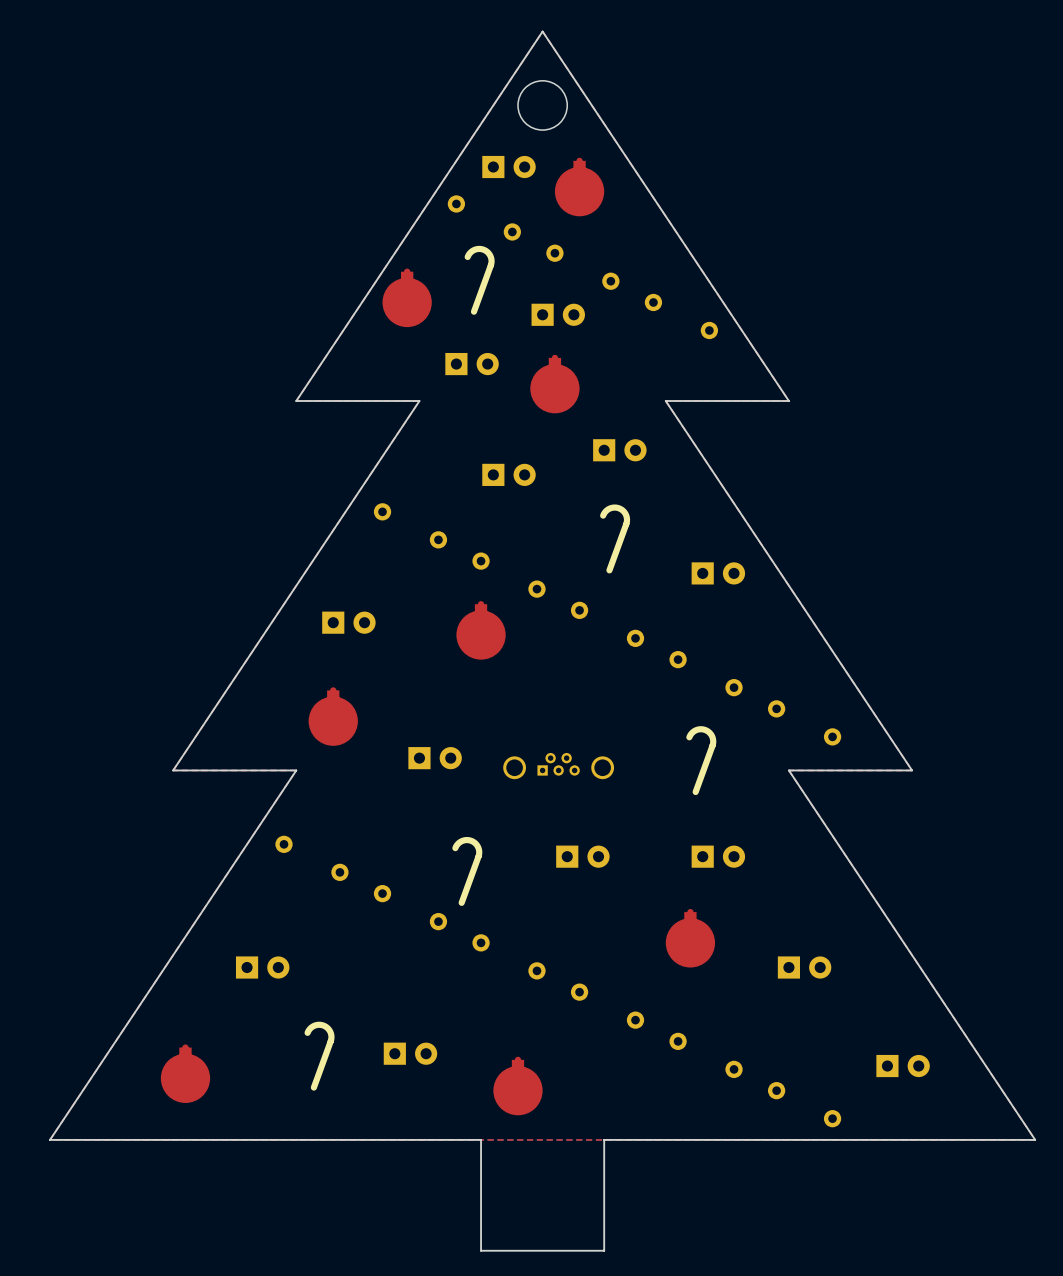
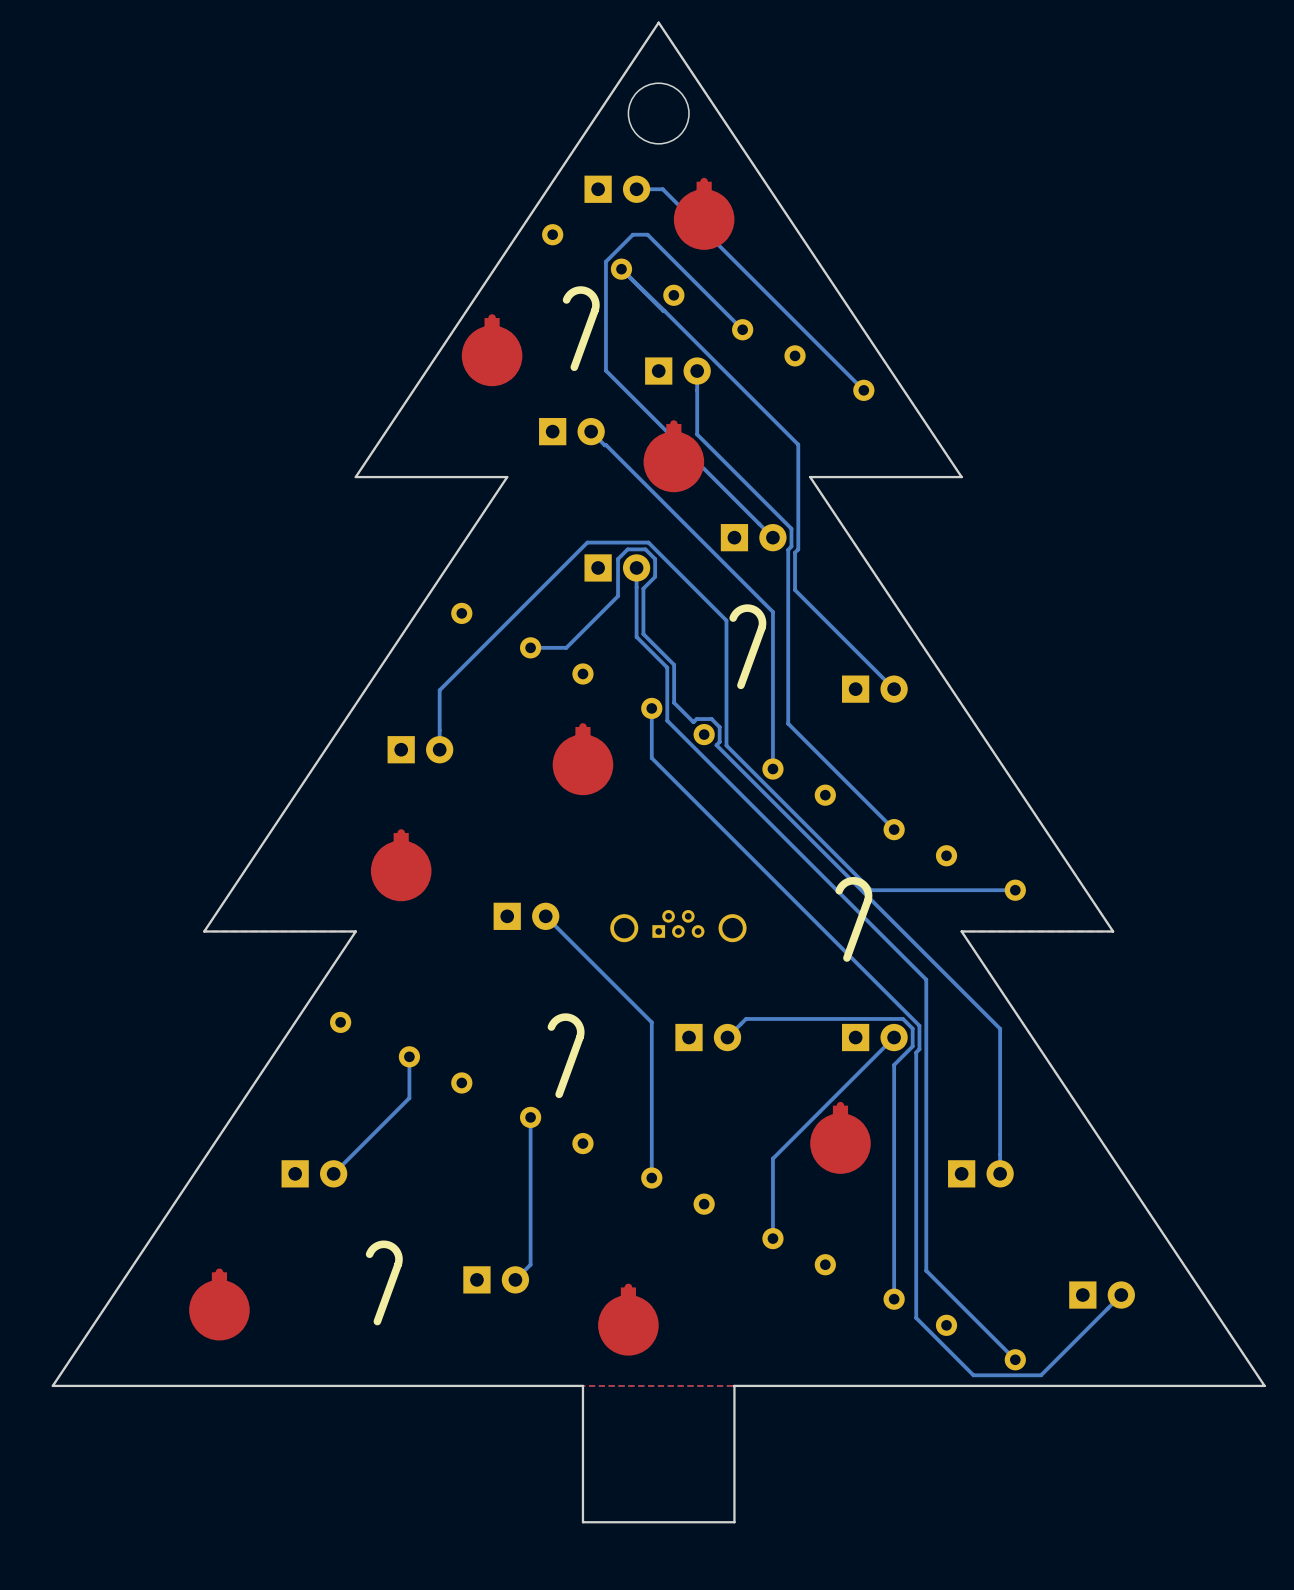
bottom track: none -> (636, 189) (662, 189) (863, 390)
bottom track: none -> (664, 310) (663, 310) (621, 269) (664, 310)
bottom track: none -> (664, 310) (798, 444) (798, 549) (795, 552) (795, 590) (894, 689)
bottom track: none -> (742, 329) (647, 234) (632, 234) (605, 261) (605, 370) (772, 537)
bottom track: none -> (697, 371) (697, 434) (791, 528) (791, 546) (788, 549) (788, 723) (894, 829)
bottom track: none -> (591, 431) (772, 611) (772, 769)
bottom track: none -> (636, 567) (636, 636) (667, 667) (667, 720) (926, 979) (926, 1270) (1015, 1359)
bottom track: none -> (530, 647) (566, 647) (618, 596) (618, 559) (627, 549) (645, 549) (655, 559) (655, 576) (643, 588) (643, 634) (674, 664) (674, 702) (693, 722) (696, 719) (711, 719) (719, 727) (719, 742) (716, 745) (1000, 1028) (1000, 1173)
bottom track: none -> (651, 708) (651, 758) (919, 1025) (919, 1049) (916, 1052) (916, 1318) (973, 1375) (1041, 1375) (1121, 1295)
bottom track: none -> (439, 749) (439, 690) (587, 542) (648, 542) (726, 620) (726, 745) (871, 890) (1015, 890)
bottom track: none -> (545, 916) (651, 1022) (651, 1178)
bottom track: none -> (727, 1037) (746, 1018) (903, 1018) (912, 1028) (912, 1046) (894, 1064) (894, 1299)
bottom track: none -> (894, 1037) (772, 1158) (772, 1238)
bottom track: none -> (409, 1056) (409, 1098) (333, 1173)
bottom track: none -> (530, 1117) (530, 1264) (515, 1279)

